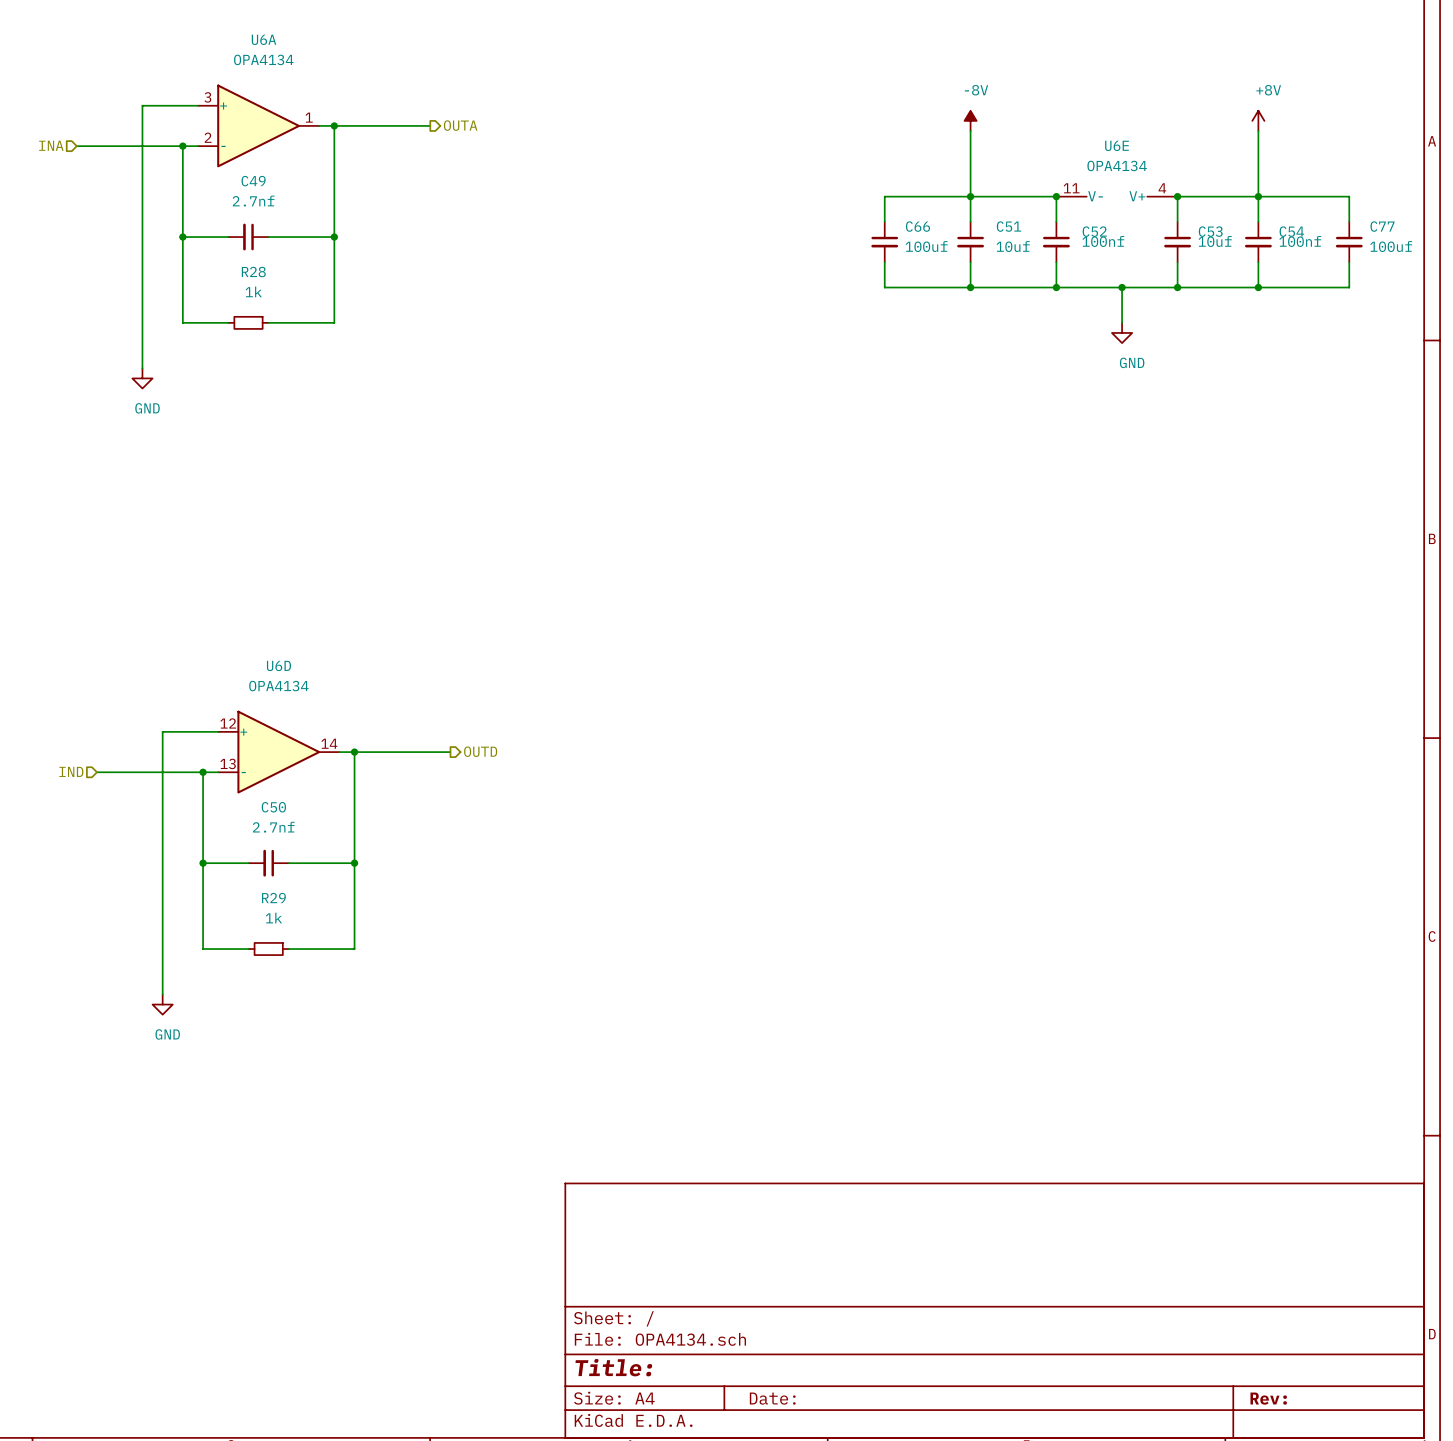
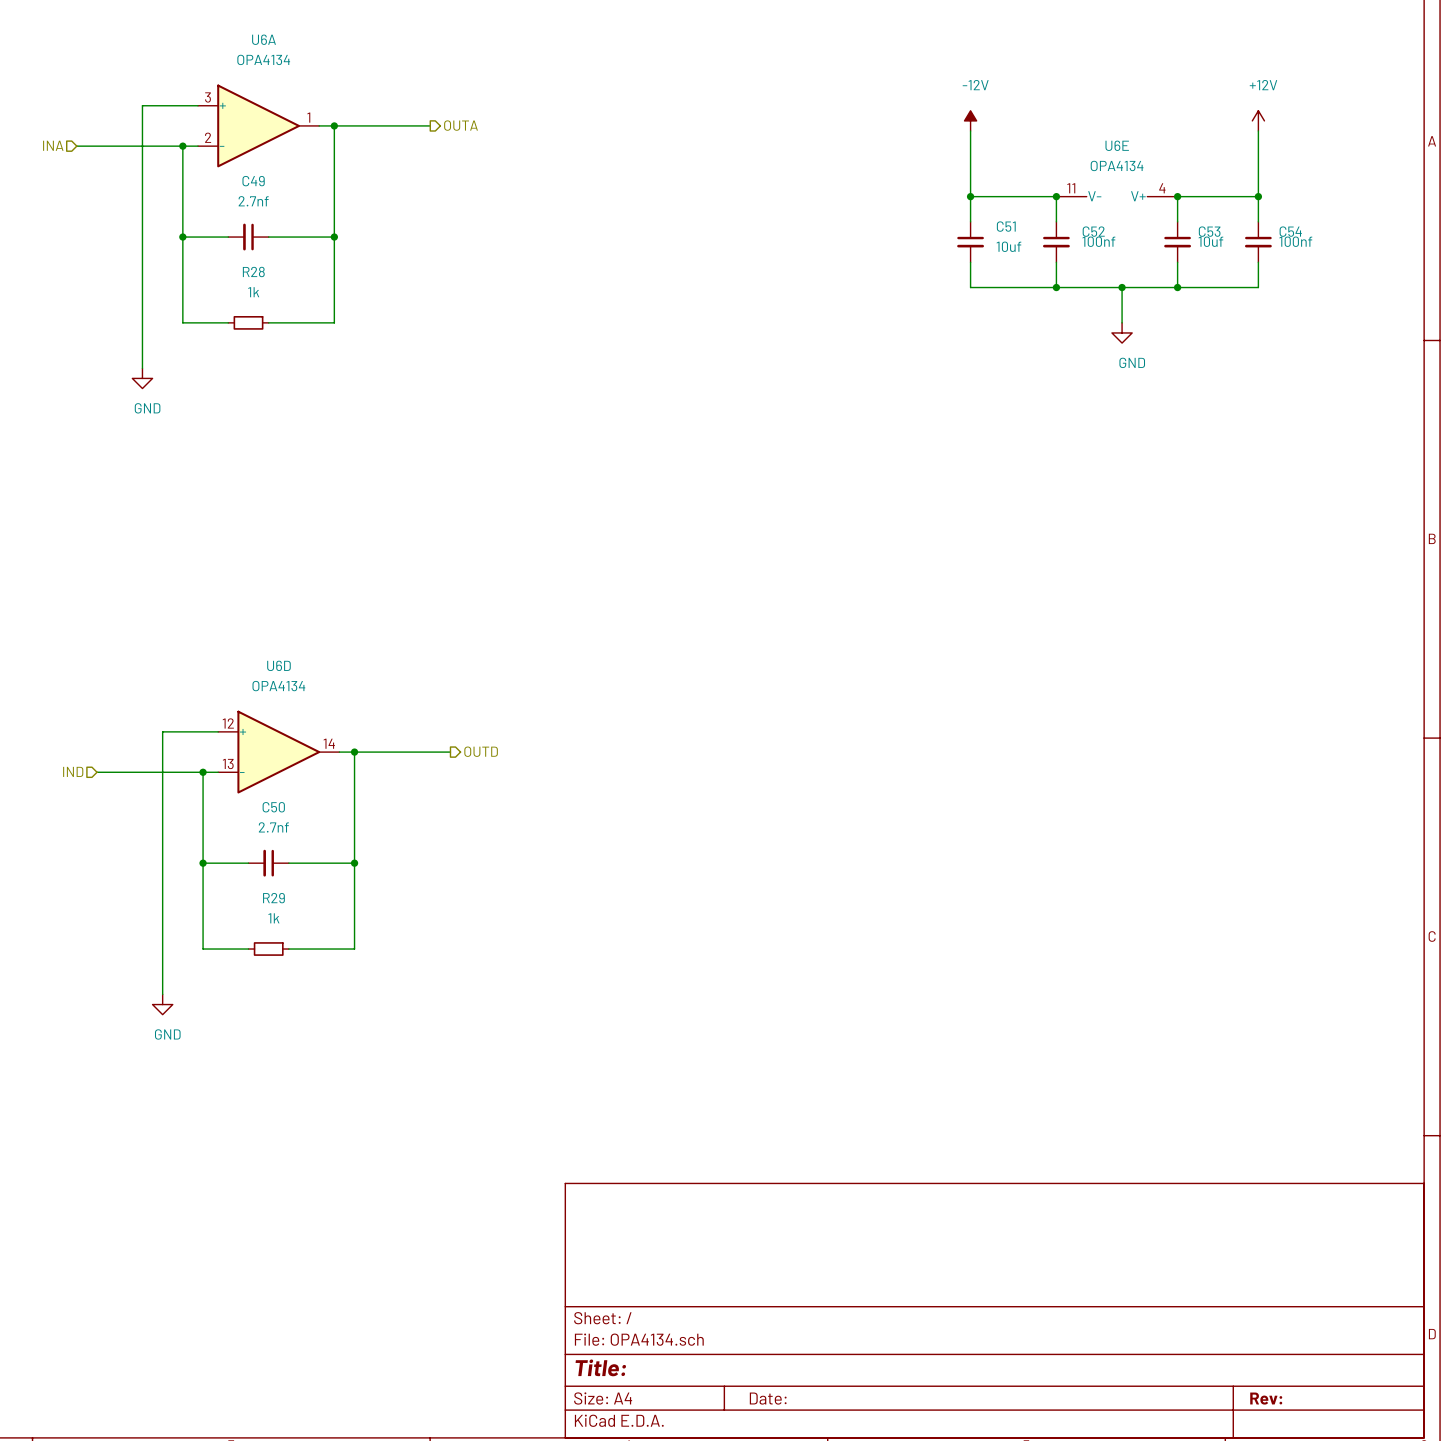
power symbol: -8V (970, 120) -> -12V (970, 120)
power symbol: +8V (1258, 120) -> +12V (1258, 120)
wire: (970, 196) (884, 196) (884, 221) -> none
wire: (1258, 196) (1349, 196) (1349, 221) -> none
C66: 100uf (884, 242) -> none
C77: 100uf (1349, 242) -> none
wire: (884, 262) (884, 287) (970, 287) -> none
wire: (1349, 262) (1349, 287) (1258, 287) -> none
junction: (970, 287) -> none
junction: (1258, 287) -> none

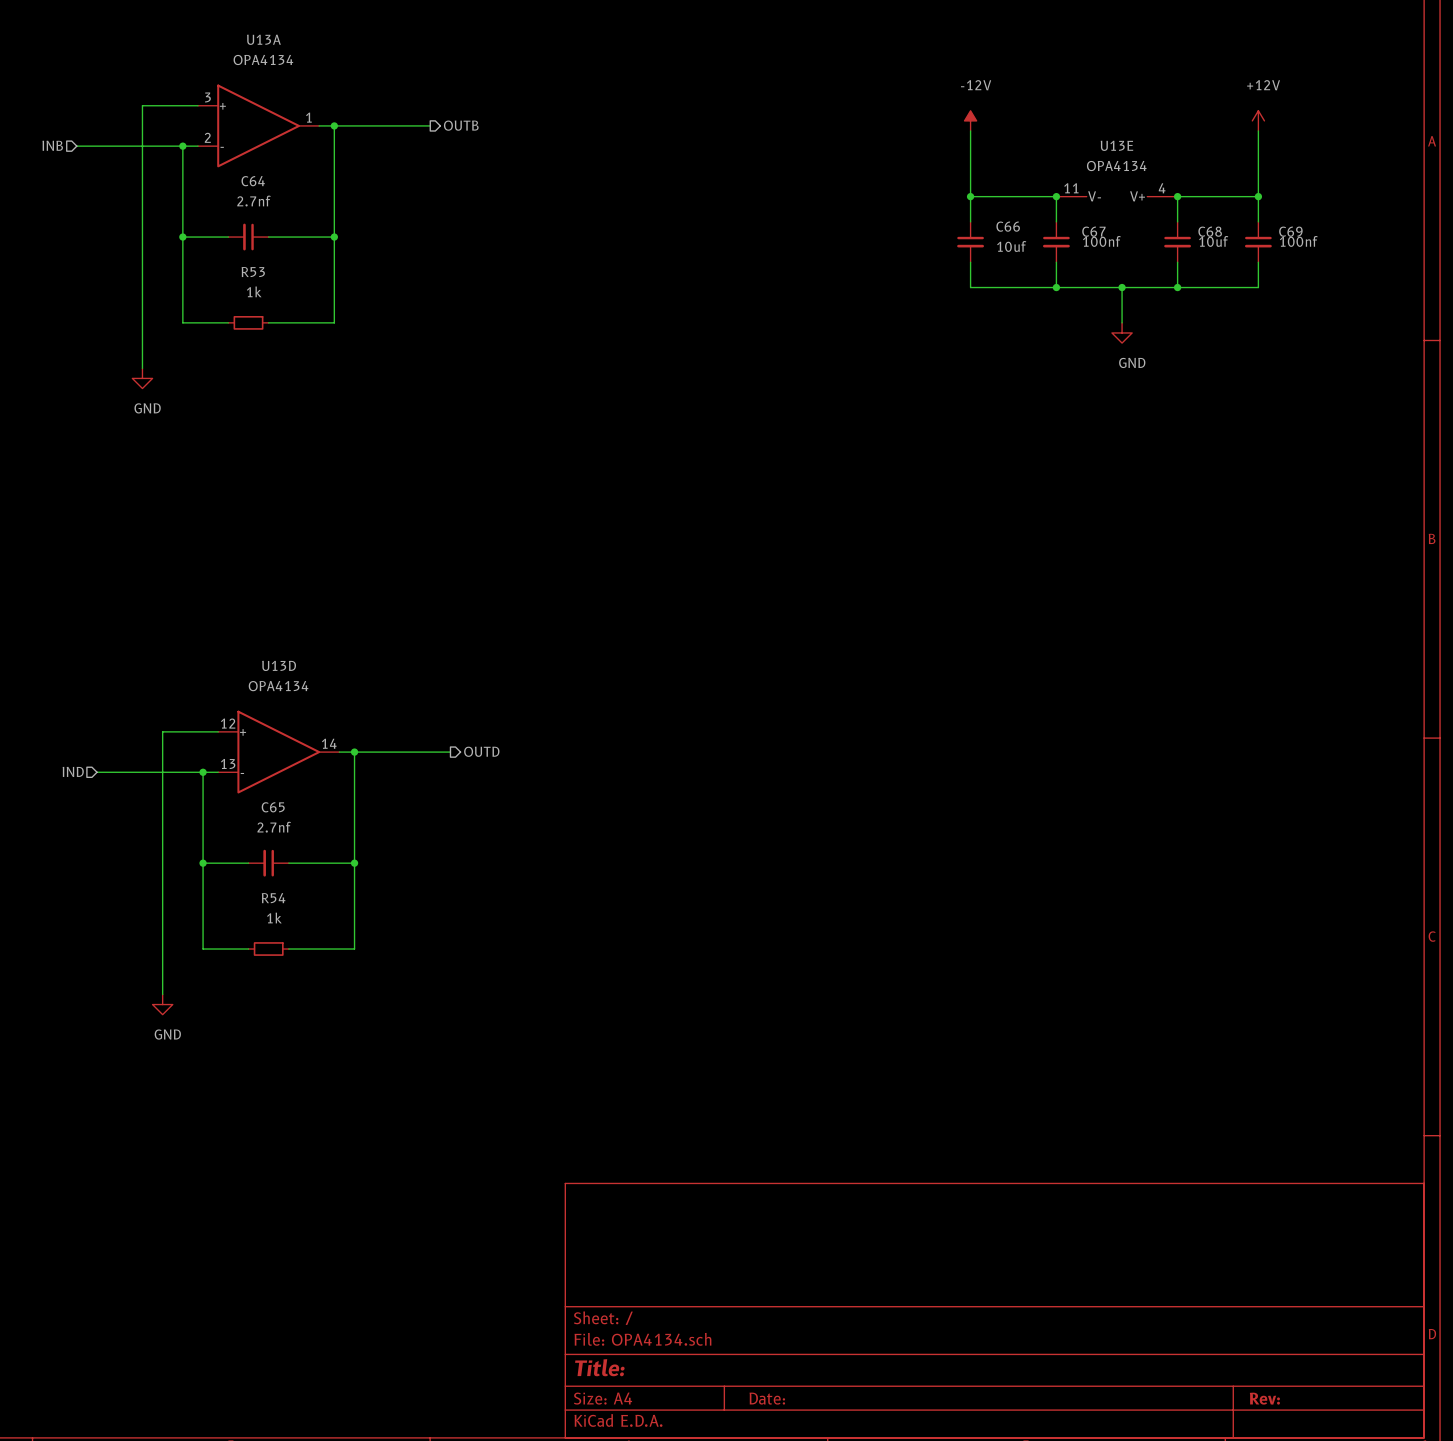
U6A name: U6A (264, 39) -> U13A (263, 39)
hierarchical label: OUTA (461, 125) -> OUTB (461, 125)
hierarchical label: INA (53, 145) -> INB (52, 145)
U6E name: U6E (1117, 145) -> U13E (1116, 145)
C49 name: C49 (253, 181) -> C64 (253, 181)
C51 name: C51 (1006, 226) -> C66 (1008, 226)
C52 name: C52 (1093, 231) -> C67 (1093, 231)
C53 name: C53 (1209, 231) -> C68 (1210, 231)
C54 name: C54 (1290, 231) -> C69 (1290, 231)
R28 name: R28 (253, 271) -> R53 (253, 272)
U6D name: U6D (278, 665) -> U13D (279, 665)
C50 name: C50 (273, 807) -> C65 (273, 807)
R29 name: R29 (273, 898) -> R54 (273, 898)

